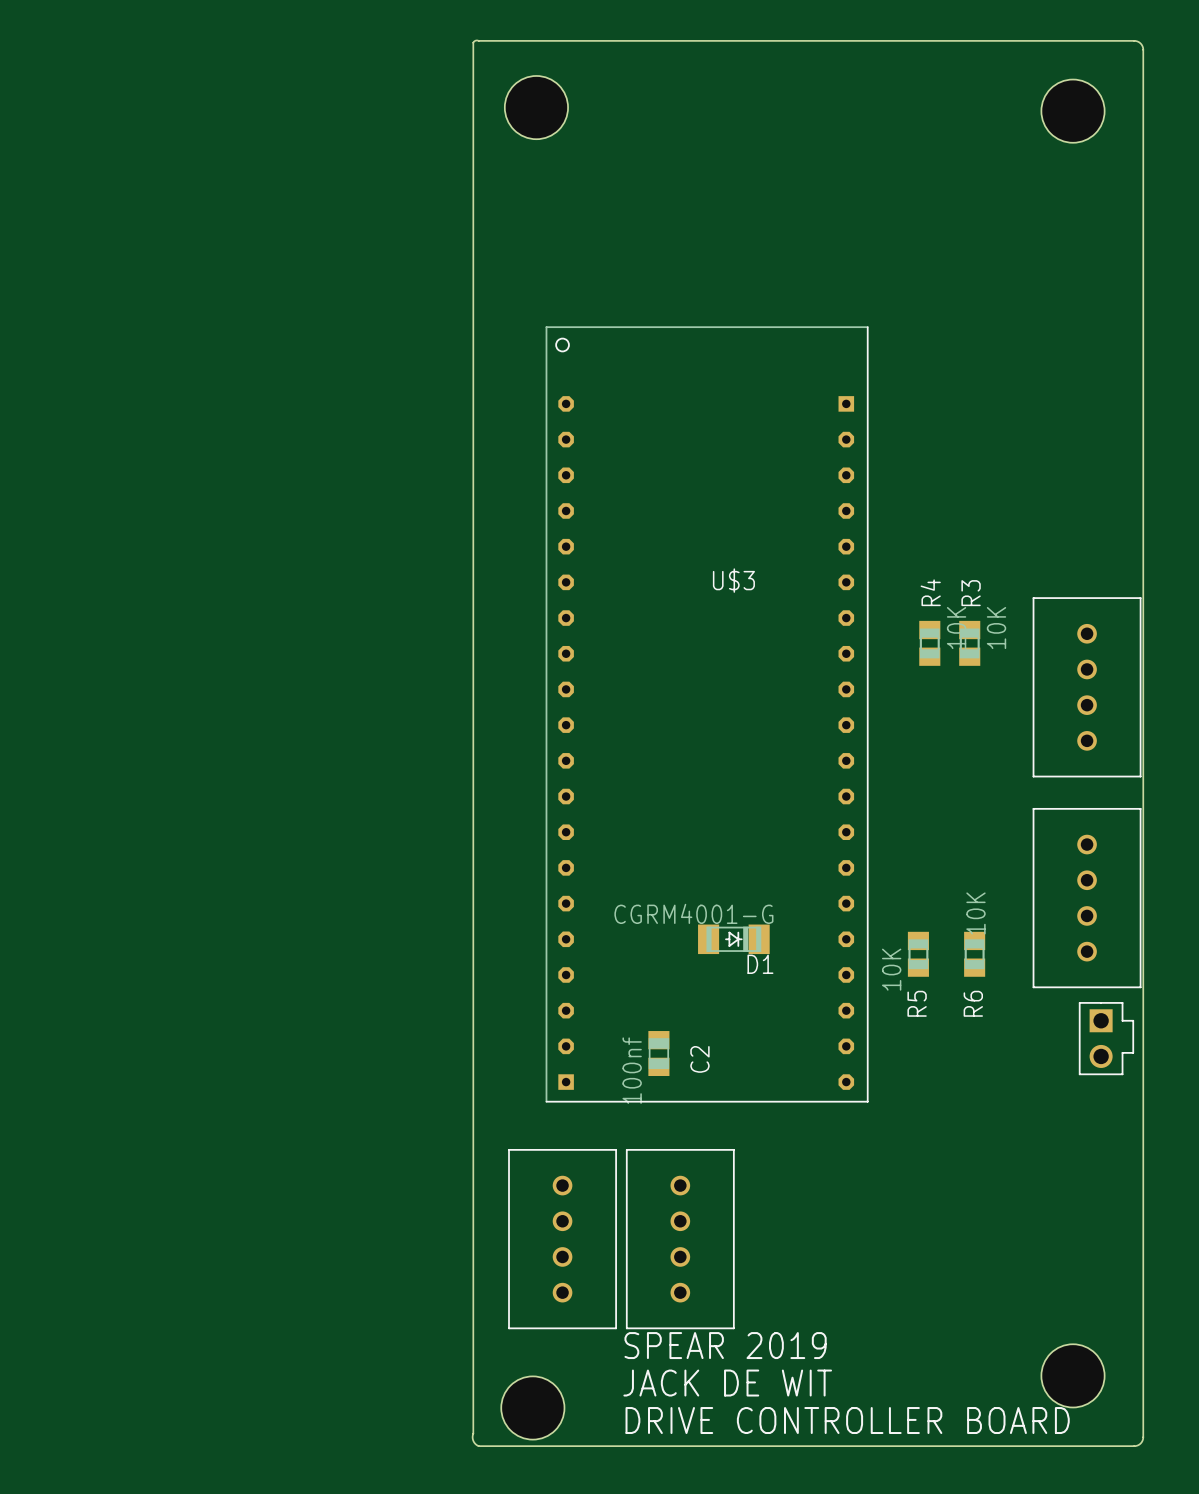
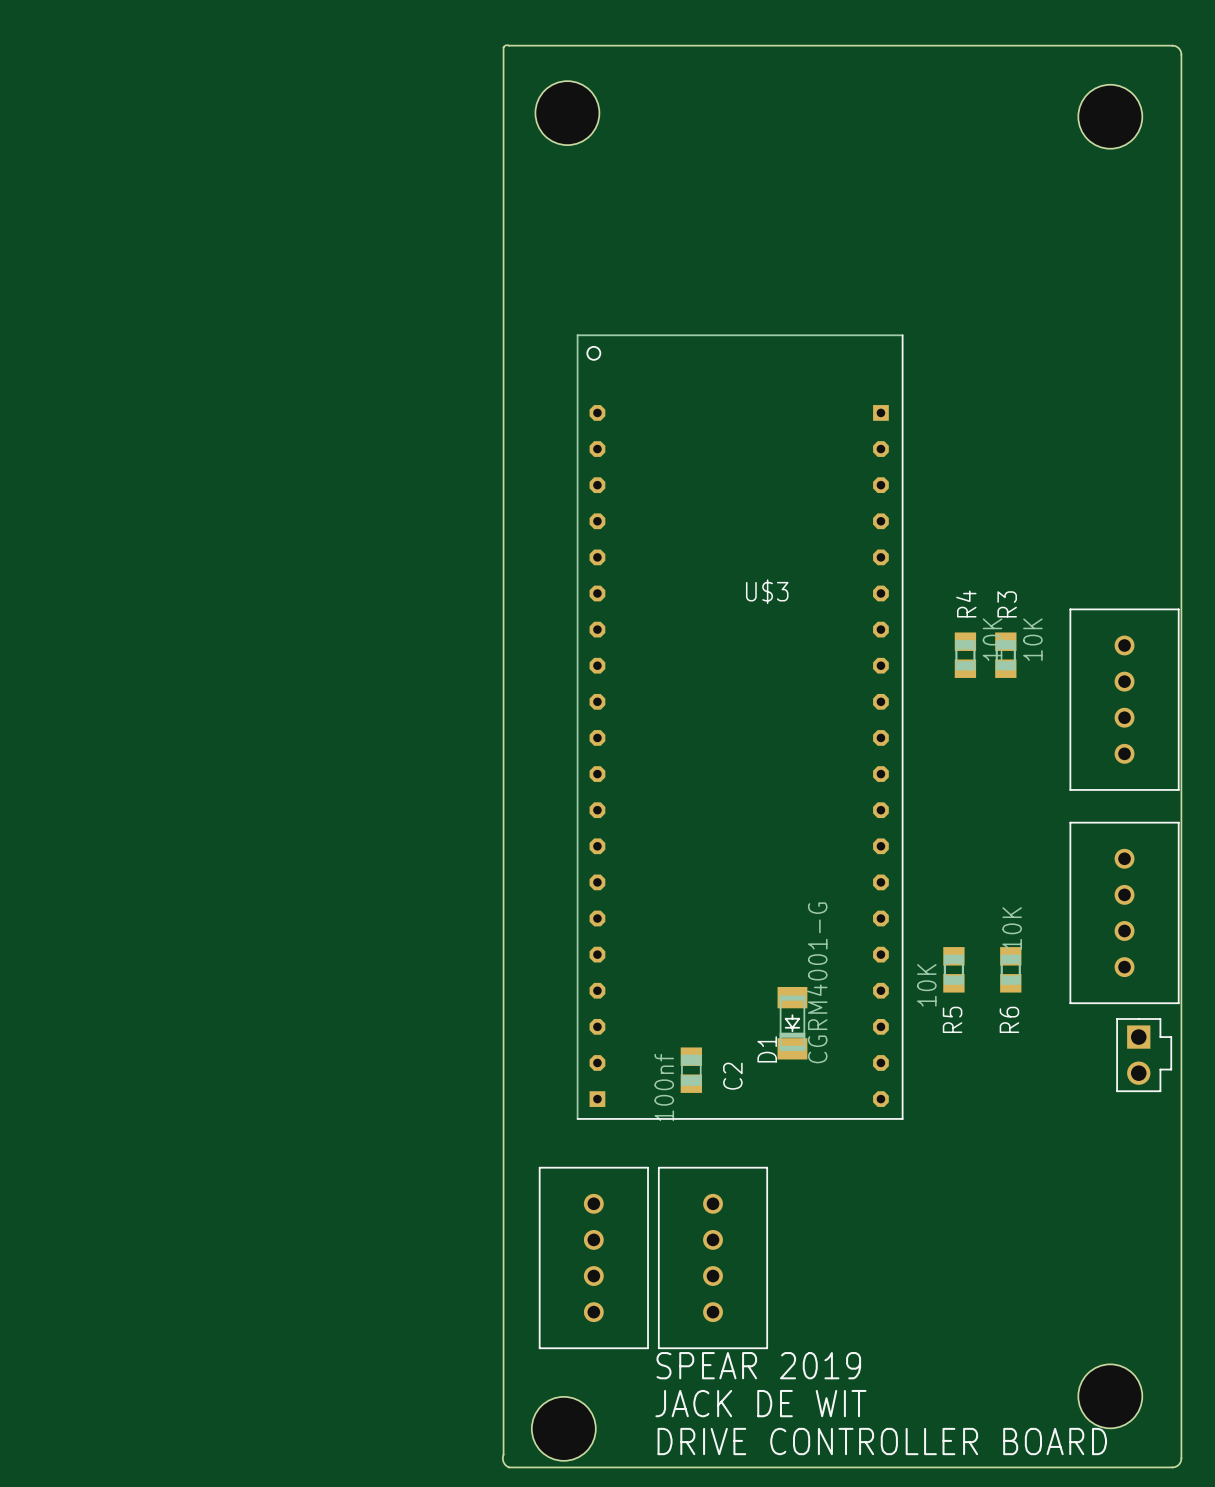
D1 rotation: 0° (733, 939) -> 90° clockwise (792, 1023)
D1 position: (733, 939) -> (792, 1023)

